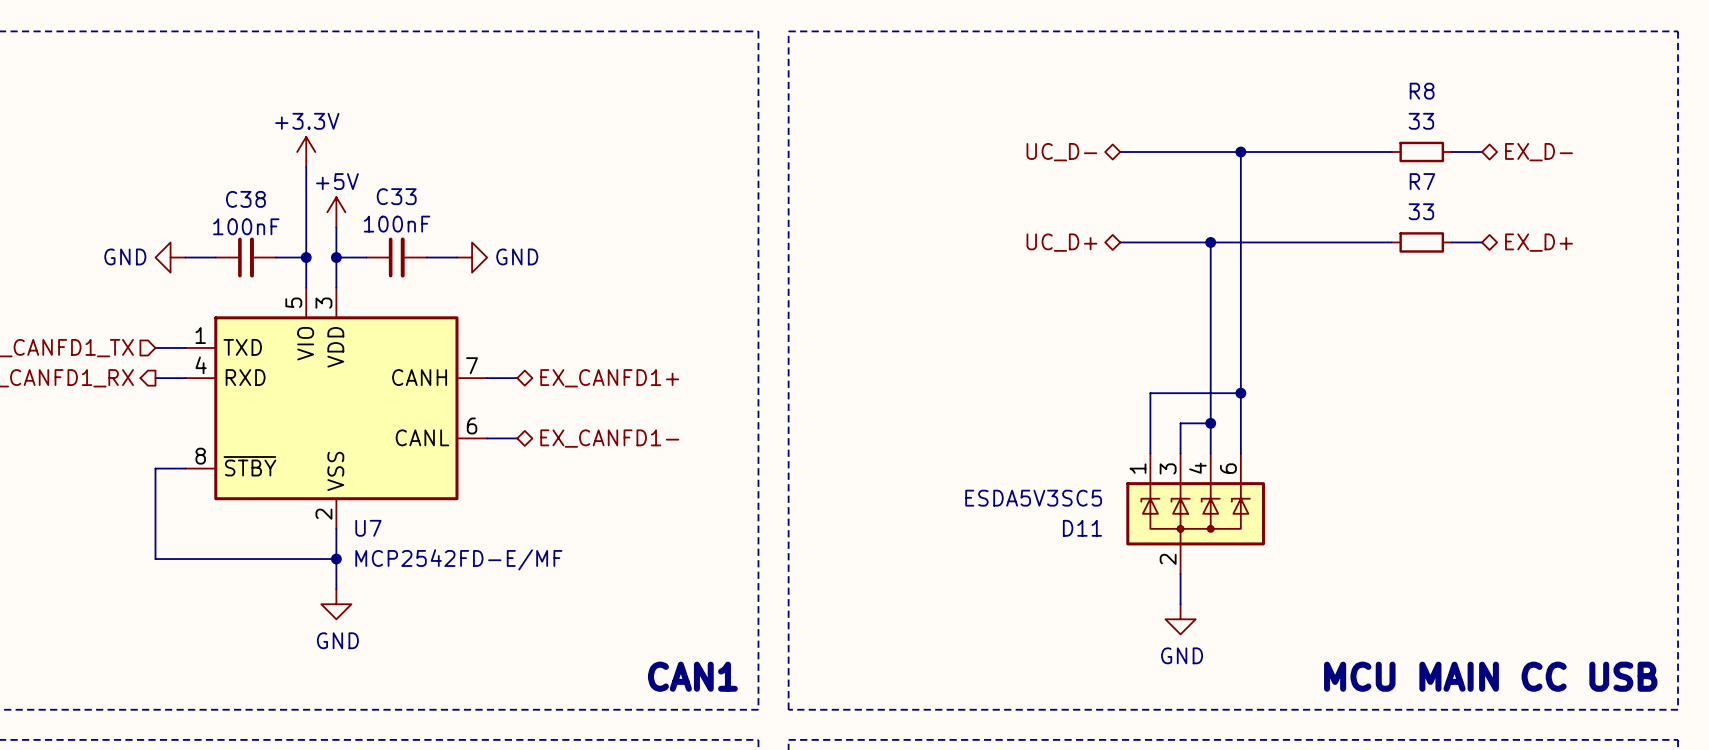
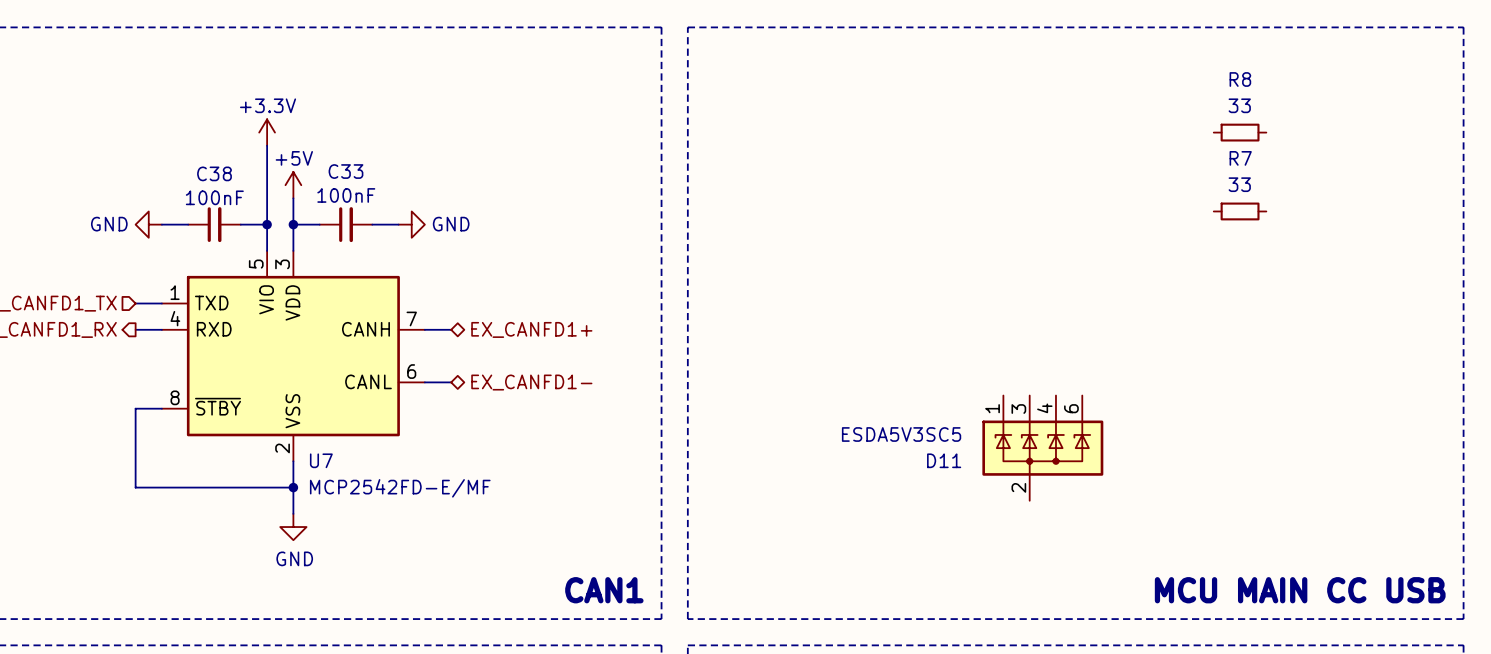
hierarchical label: UC_D- (1061, 152) -> none
wire: (1120, 152) (1391, 152) -> none
wire: (1240, 152) (1240, 453) -> none
junction: (1240, 152) -> none
wire: (1451, 152) (1482, 152) -> none
hierarchical label: EX_D- (1538, 152) -> none
hierarchical label: UC_D+ (1061, 242) -> none
wire: (1120, 242) (1391, 242) -> none
wire: (1210, 242) (1210, 453) -> none
junction: (1210, 242) -> none
wire: (1451, 242) (1482, 242) -> none
hierarchical label: EX_D+ (1538, 242) -> none
wire: (1240, 393) (1150, 393) (1150, 453) -> none
junction: (1240, 393) -> none
wire: (1210, 423) (1180, 423) (1180, 453) -> none
junction: (1210, 423) -> none
wire: (1180, 574) (1180, 604) -> none
power symbol: GND (1180, 619) -> none

